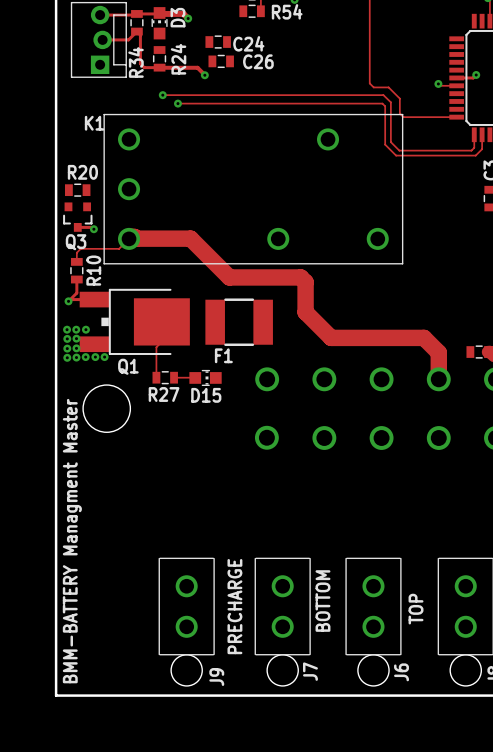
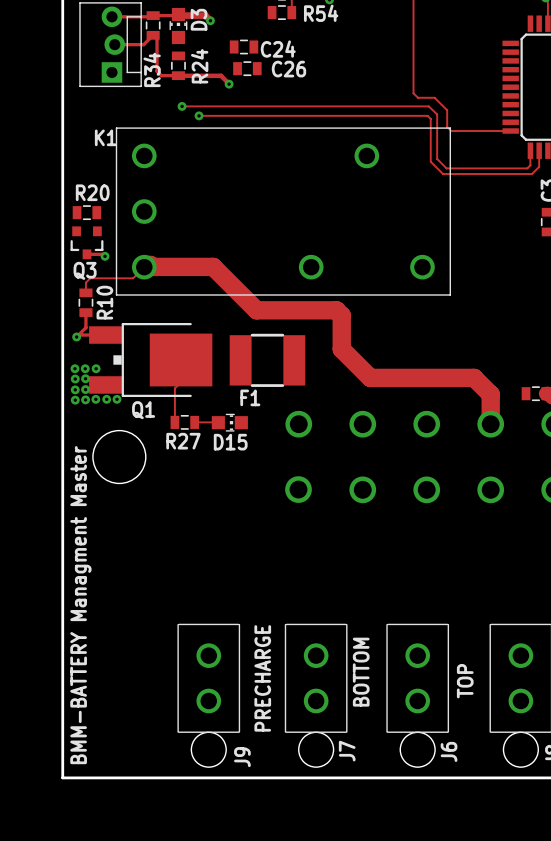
track: (476, 74) (473, 77) (456, 77) -> none
via: (476, 74) -> none
track: (438, 83) (440, 85) (456, 85) -> none
via: (438, 83) -> none

